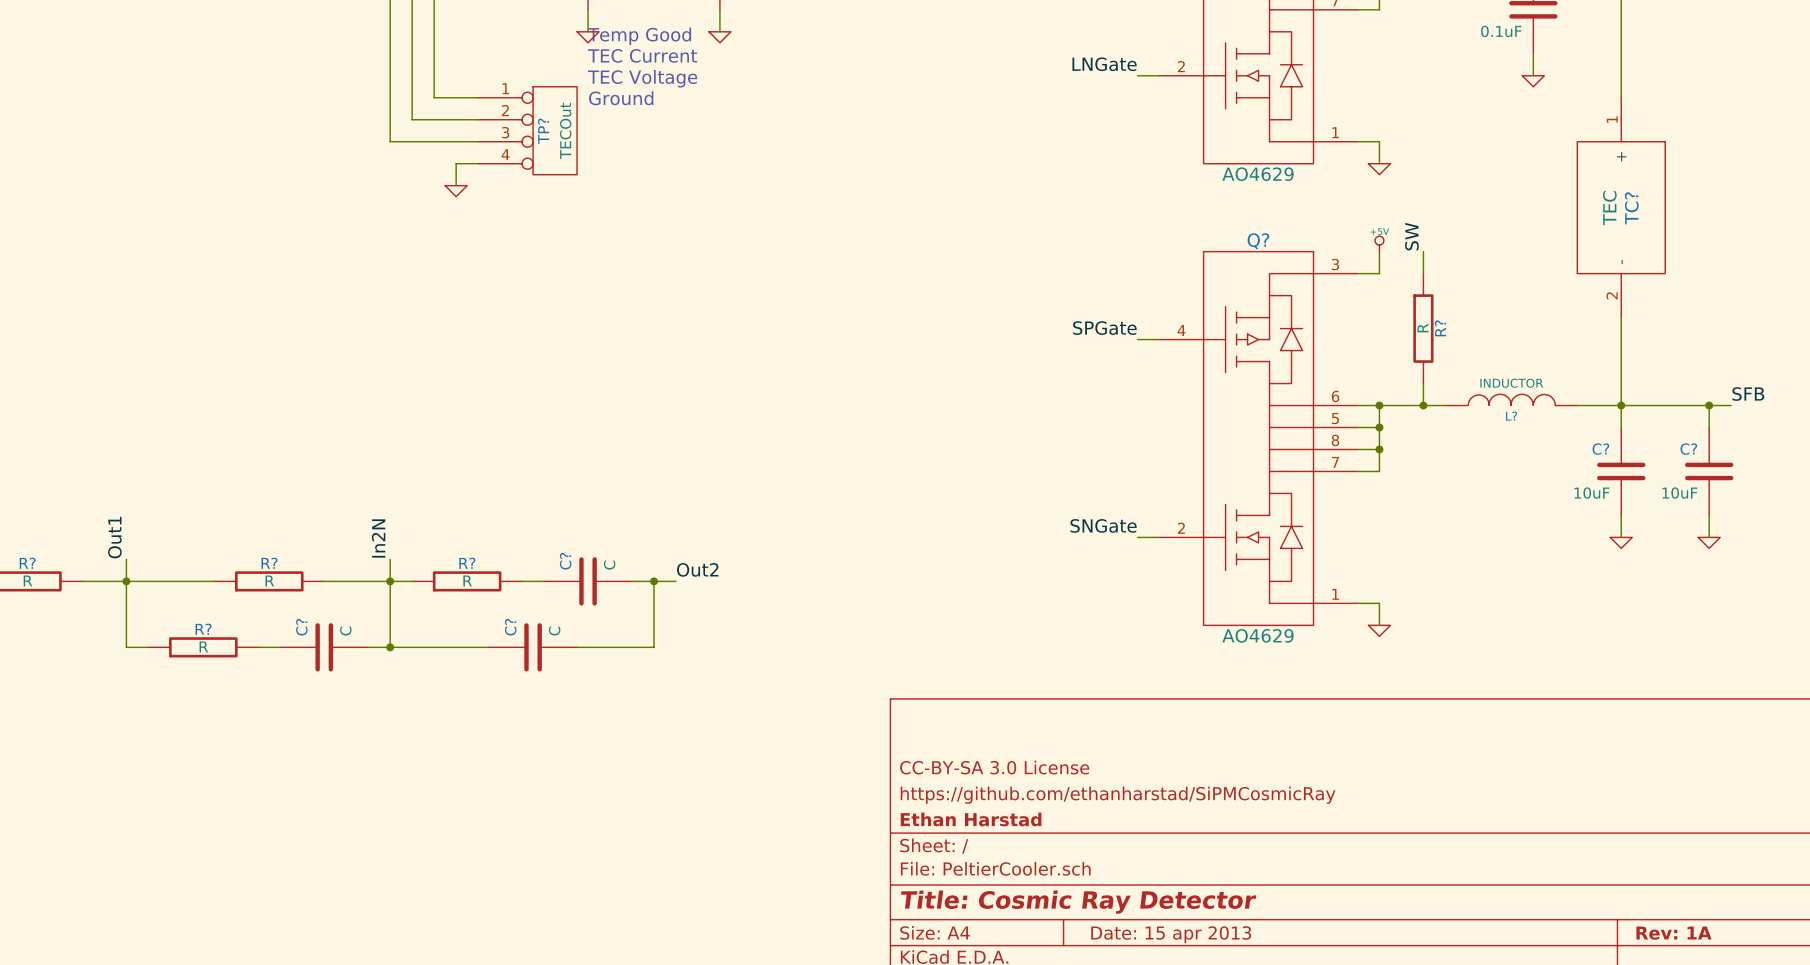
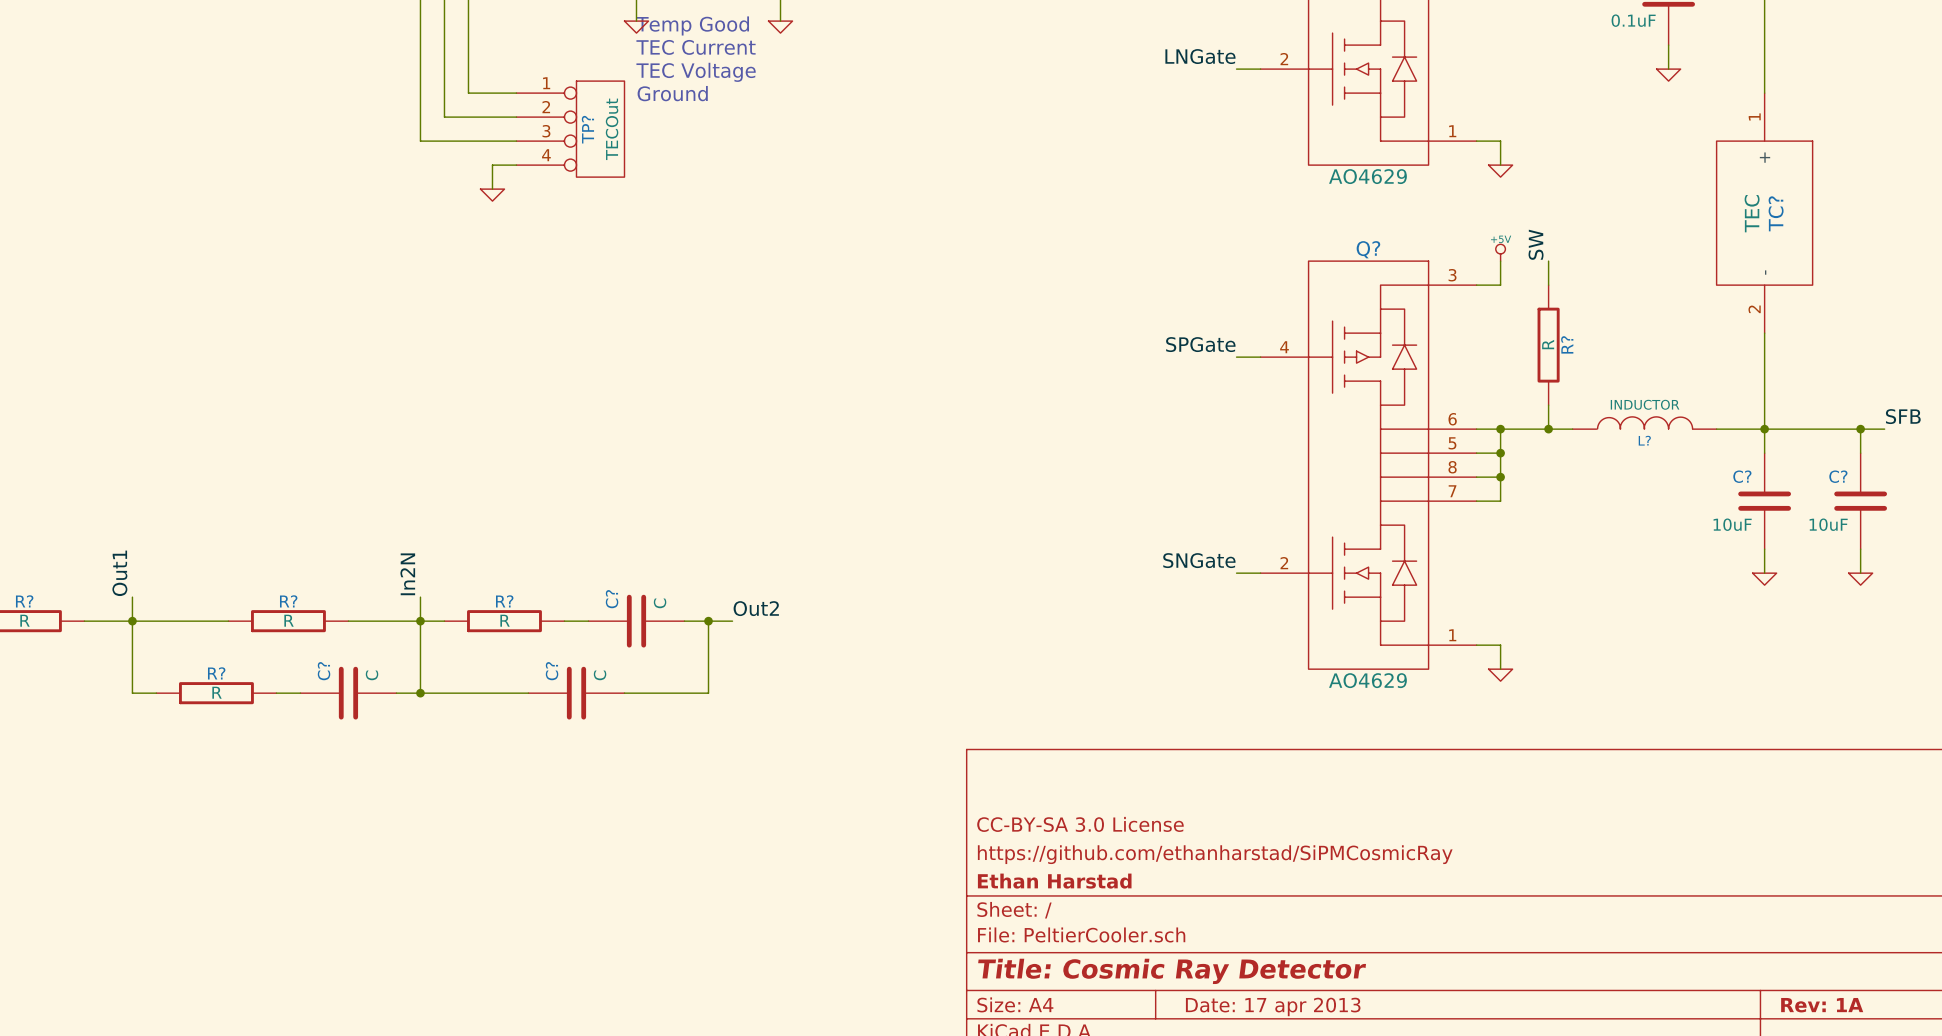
title block: Date: 15 apr 2013 (1171, 934) -> Date: 17 apr 2013 (1273, 1006)

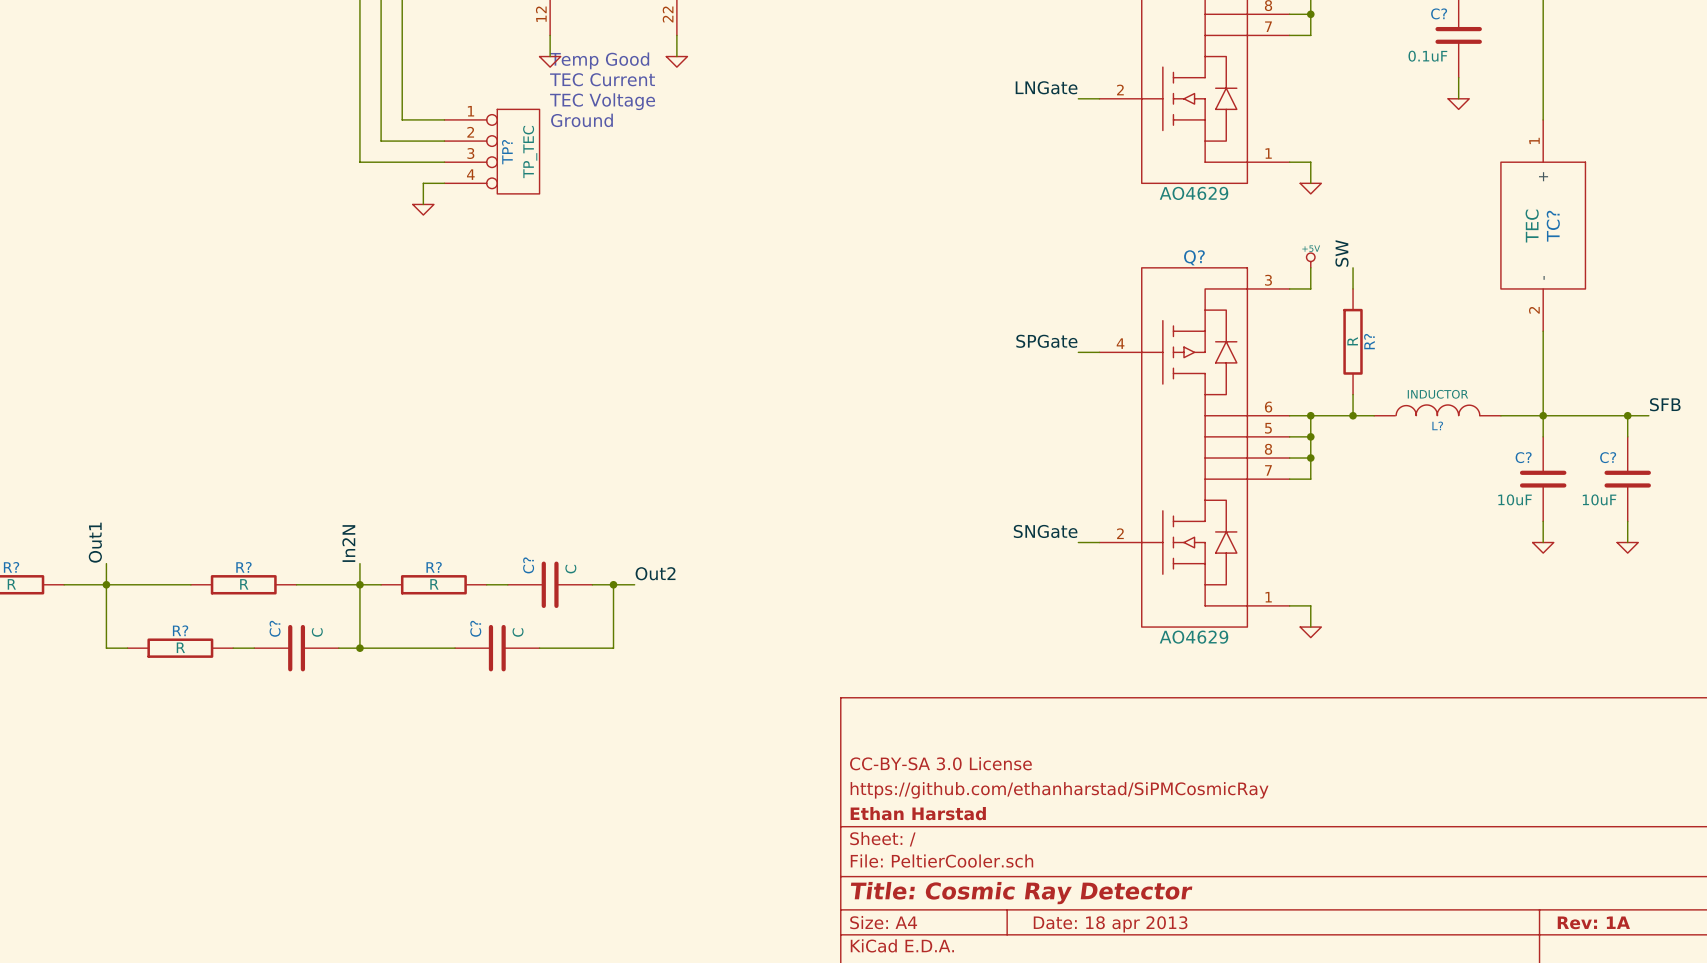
TP? value: TECOut (612, 129) -> TP_TEC (530, 152)
title block: Date: 17 apr 2013 (1273, 1006) -> Date: 18 apr 2013 (1110, 924)

